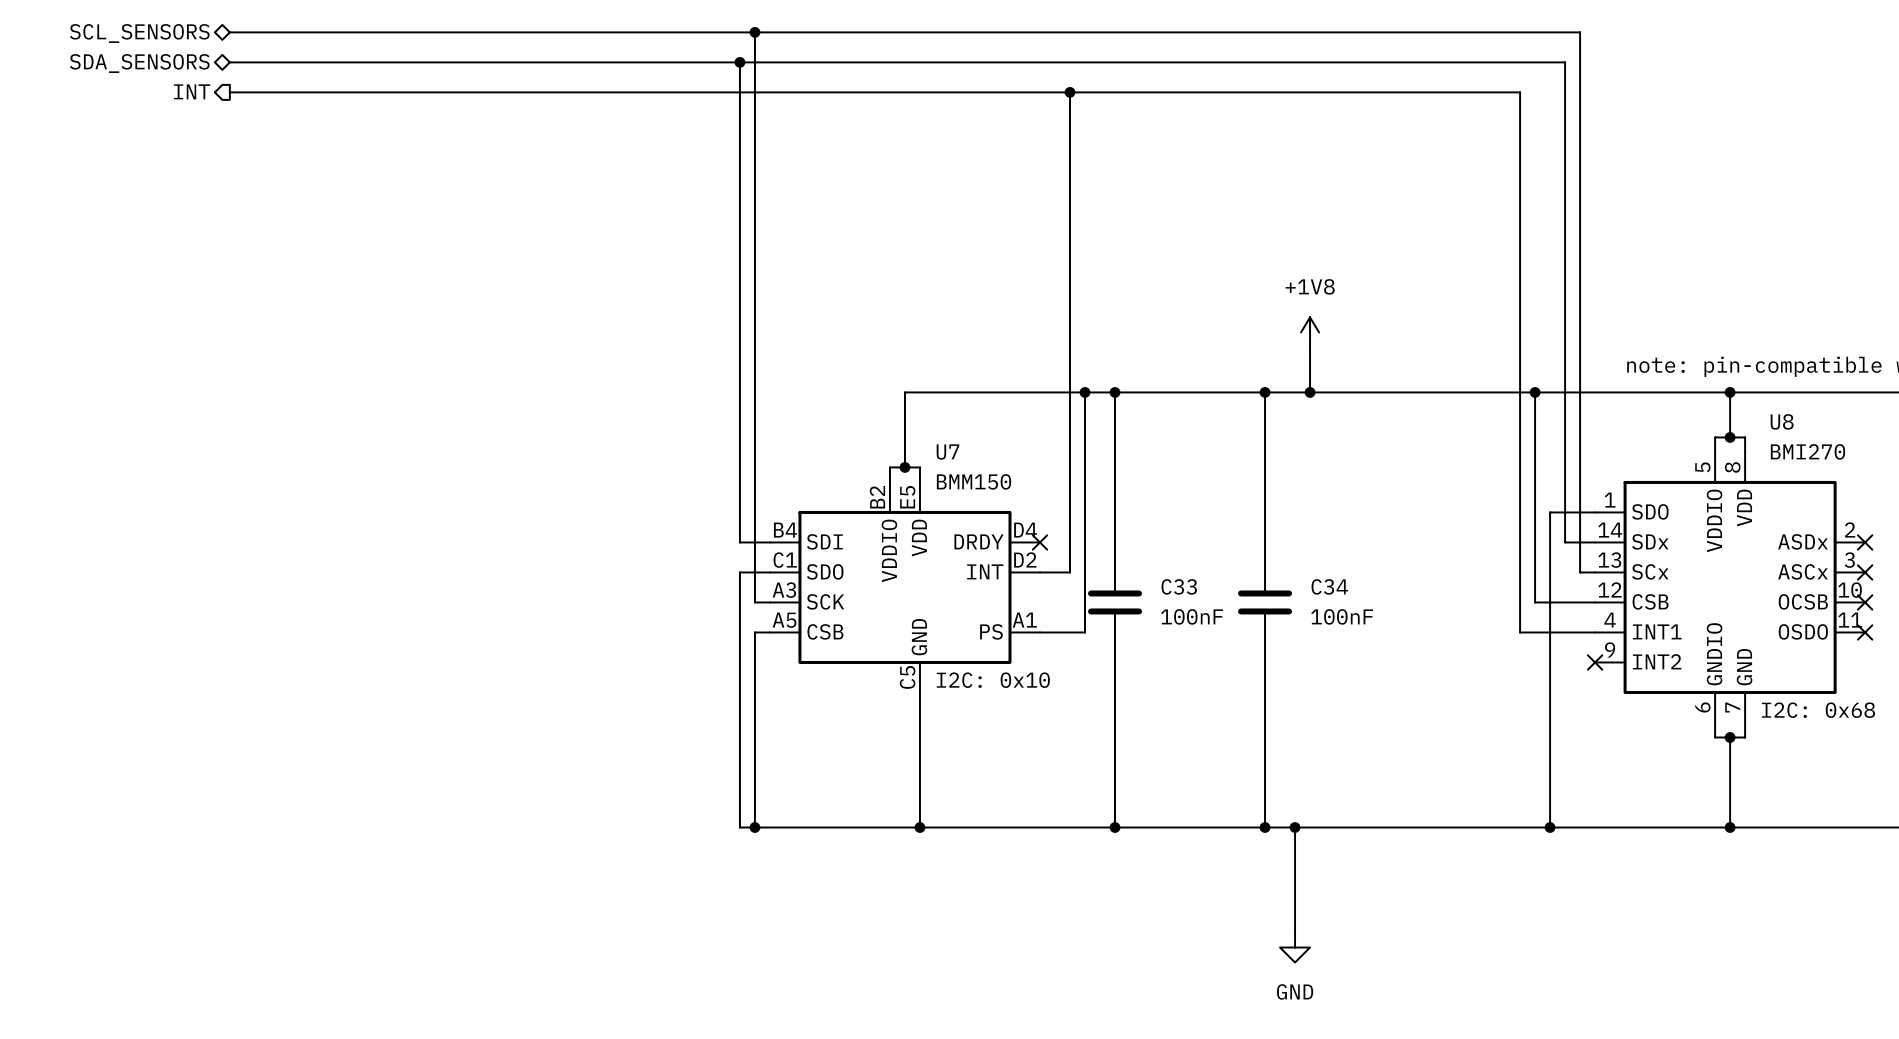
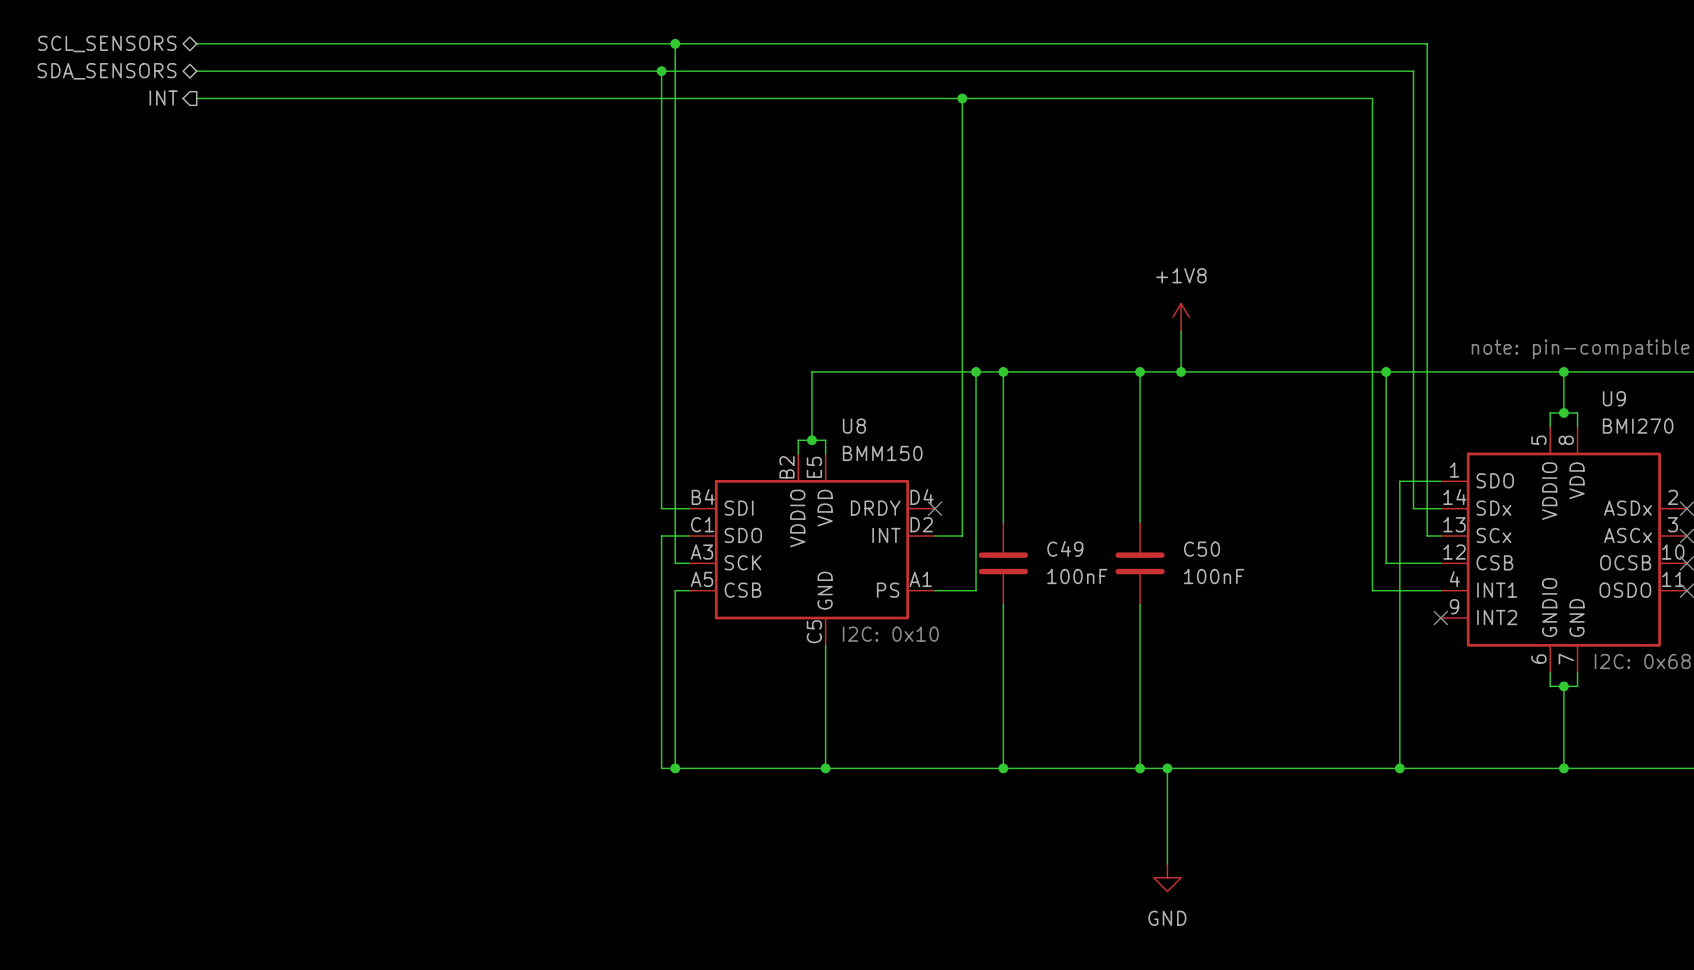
U8 name: U8 (1782, 421) -> U9 (1614, 398)
U7 name: U7 (948, 452) -> U8 (854, 426)
C33 name: C33 (1179, 586) -> C49 (1065, 548)
C34 name: C34 (1329, 586) -> C50 (1202, 549)

